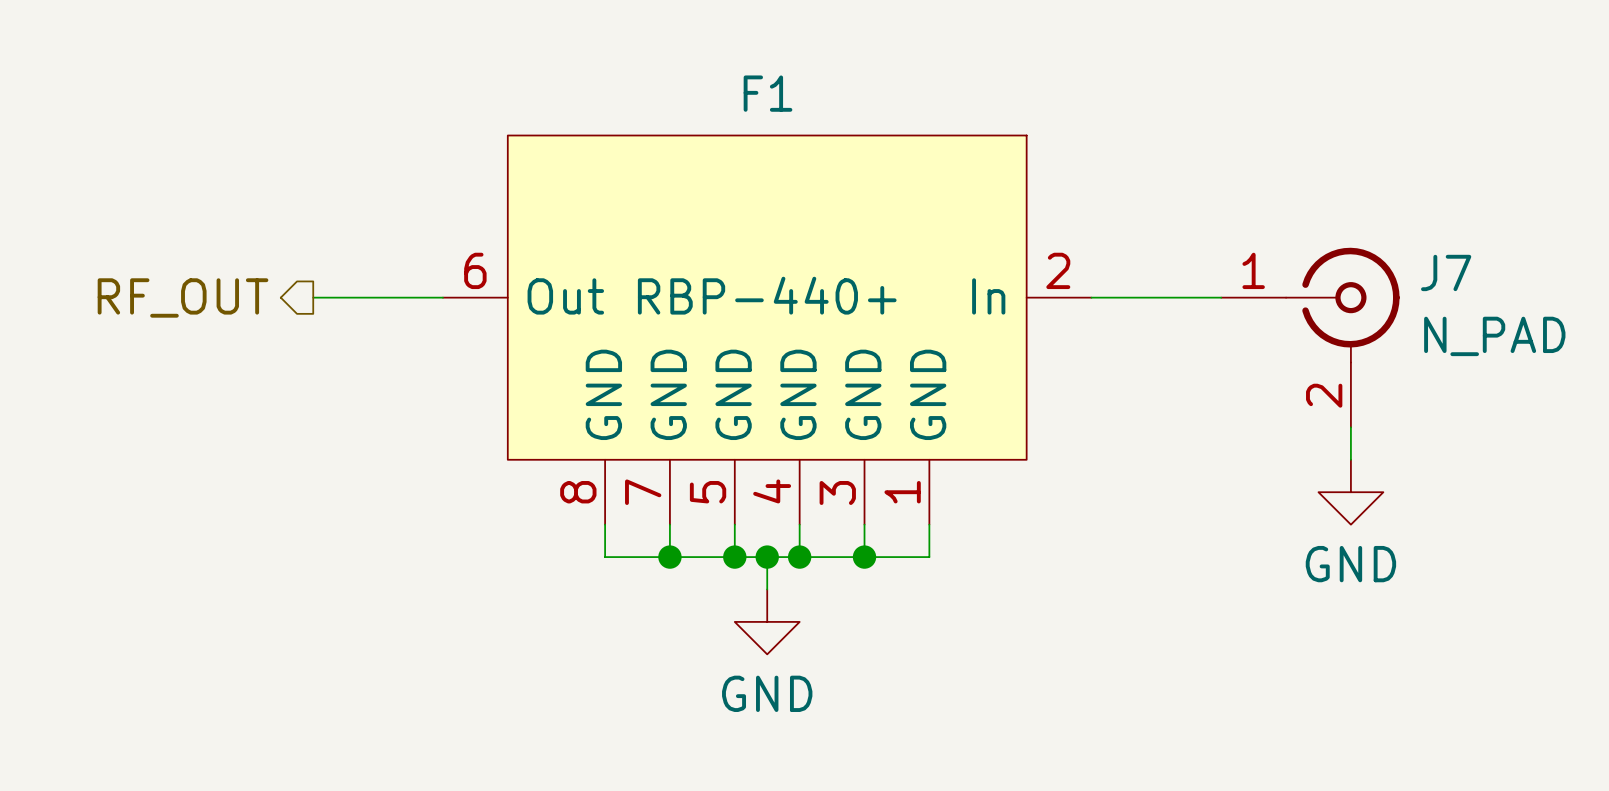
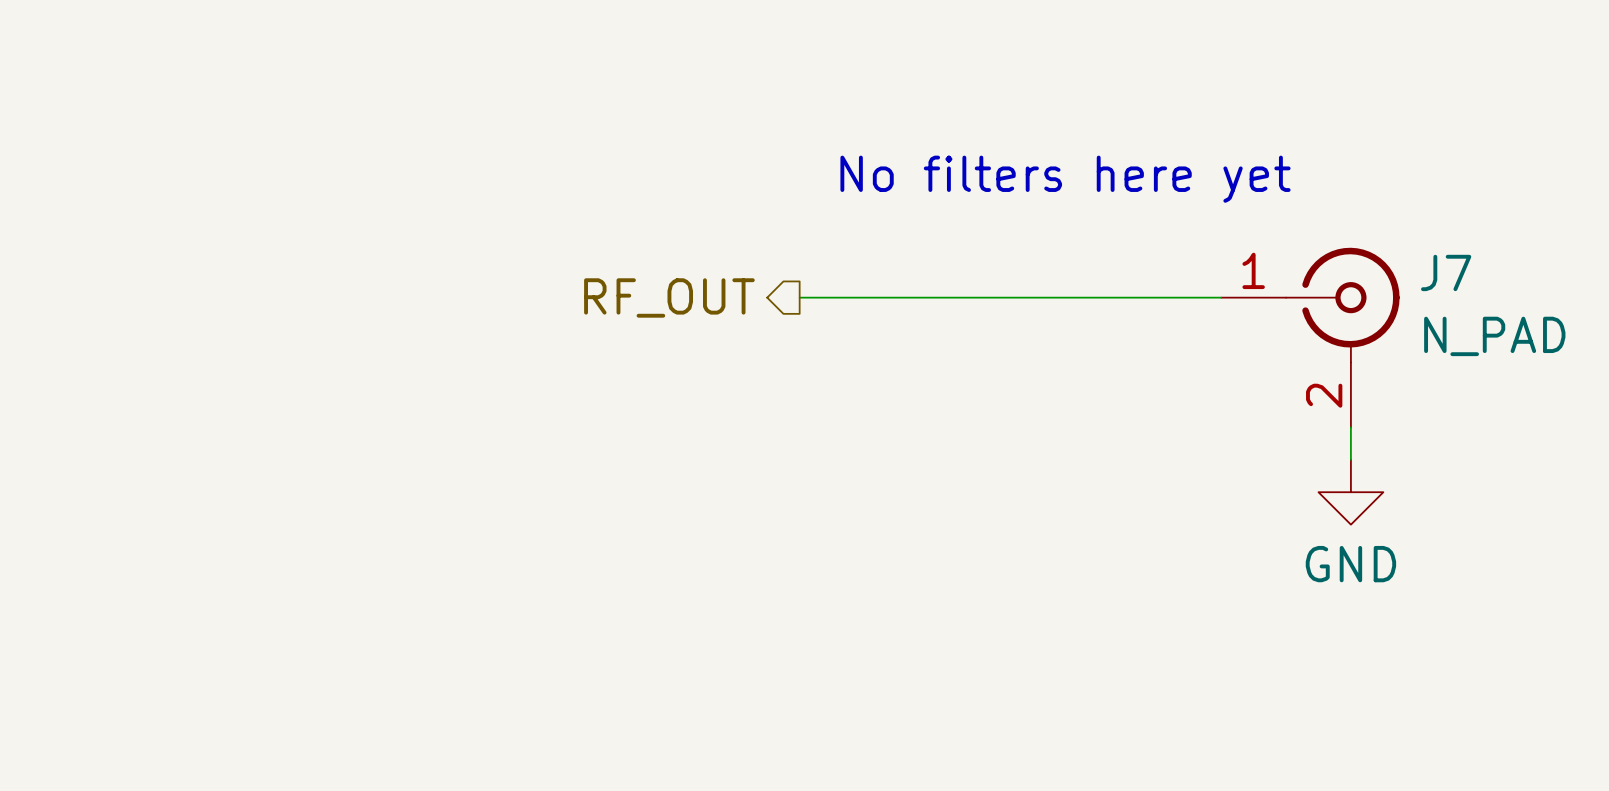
text: none -> No filters here yet (1065, 179)
hierarchical label position: RF_OUT (183, 297) -> RF_OUT (669, 297)
wire: (313, 297) (442, 297) -> none
F1: RBP-440+ (767, 330) -> none
wire: (605, 524) (605, 557) (929, 557) (929, 524) -> none
wire: (669, 524) (669, 557) -> none
wire: (734, 524) (734, 557) -> none
wire: (799, 524) (799, 557) -> none
wire: (864, 524) (864, 557) -> none
junction: (669, 557) -> none
junction: (734, 557) -> none
wire: (767, 557) (767, 589) -> none
junction: (767, 557) -> none
junction: (799, 557) -> none
junction: (864, 557) -> none
power symbol: GND (767, 621) -> none

